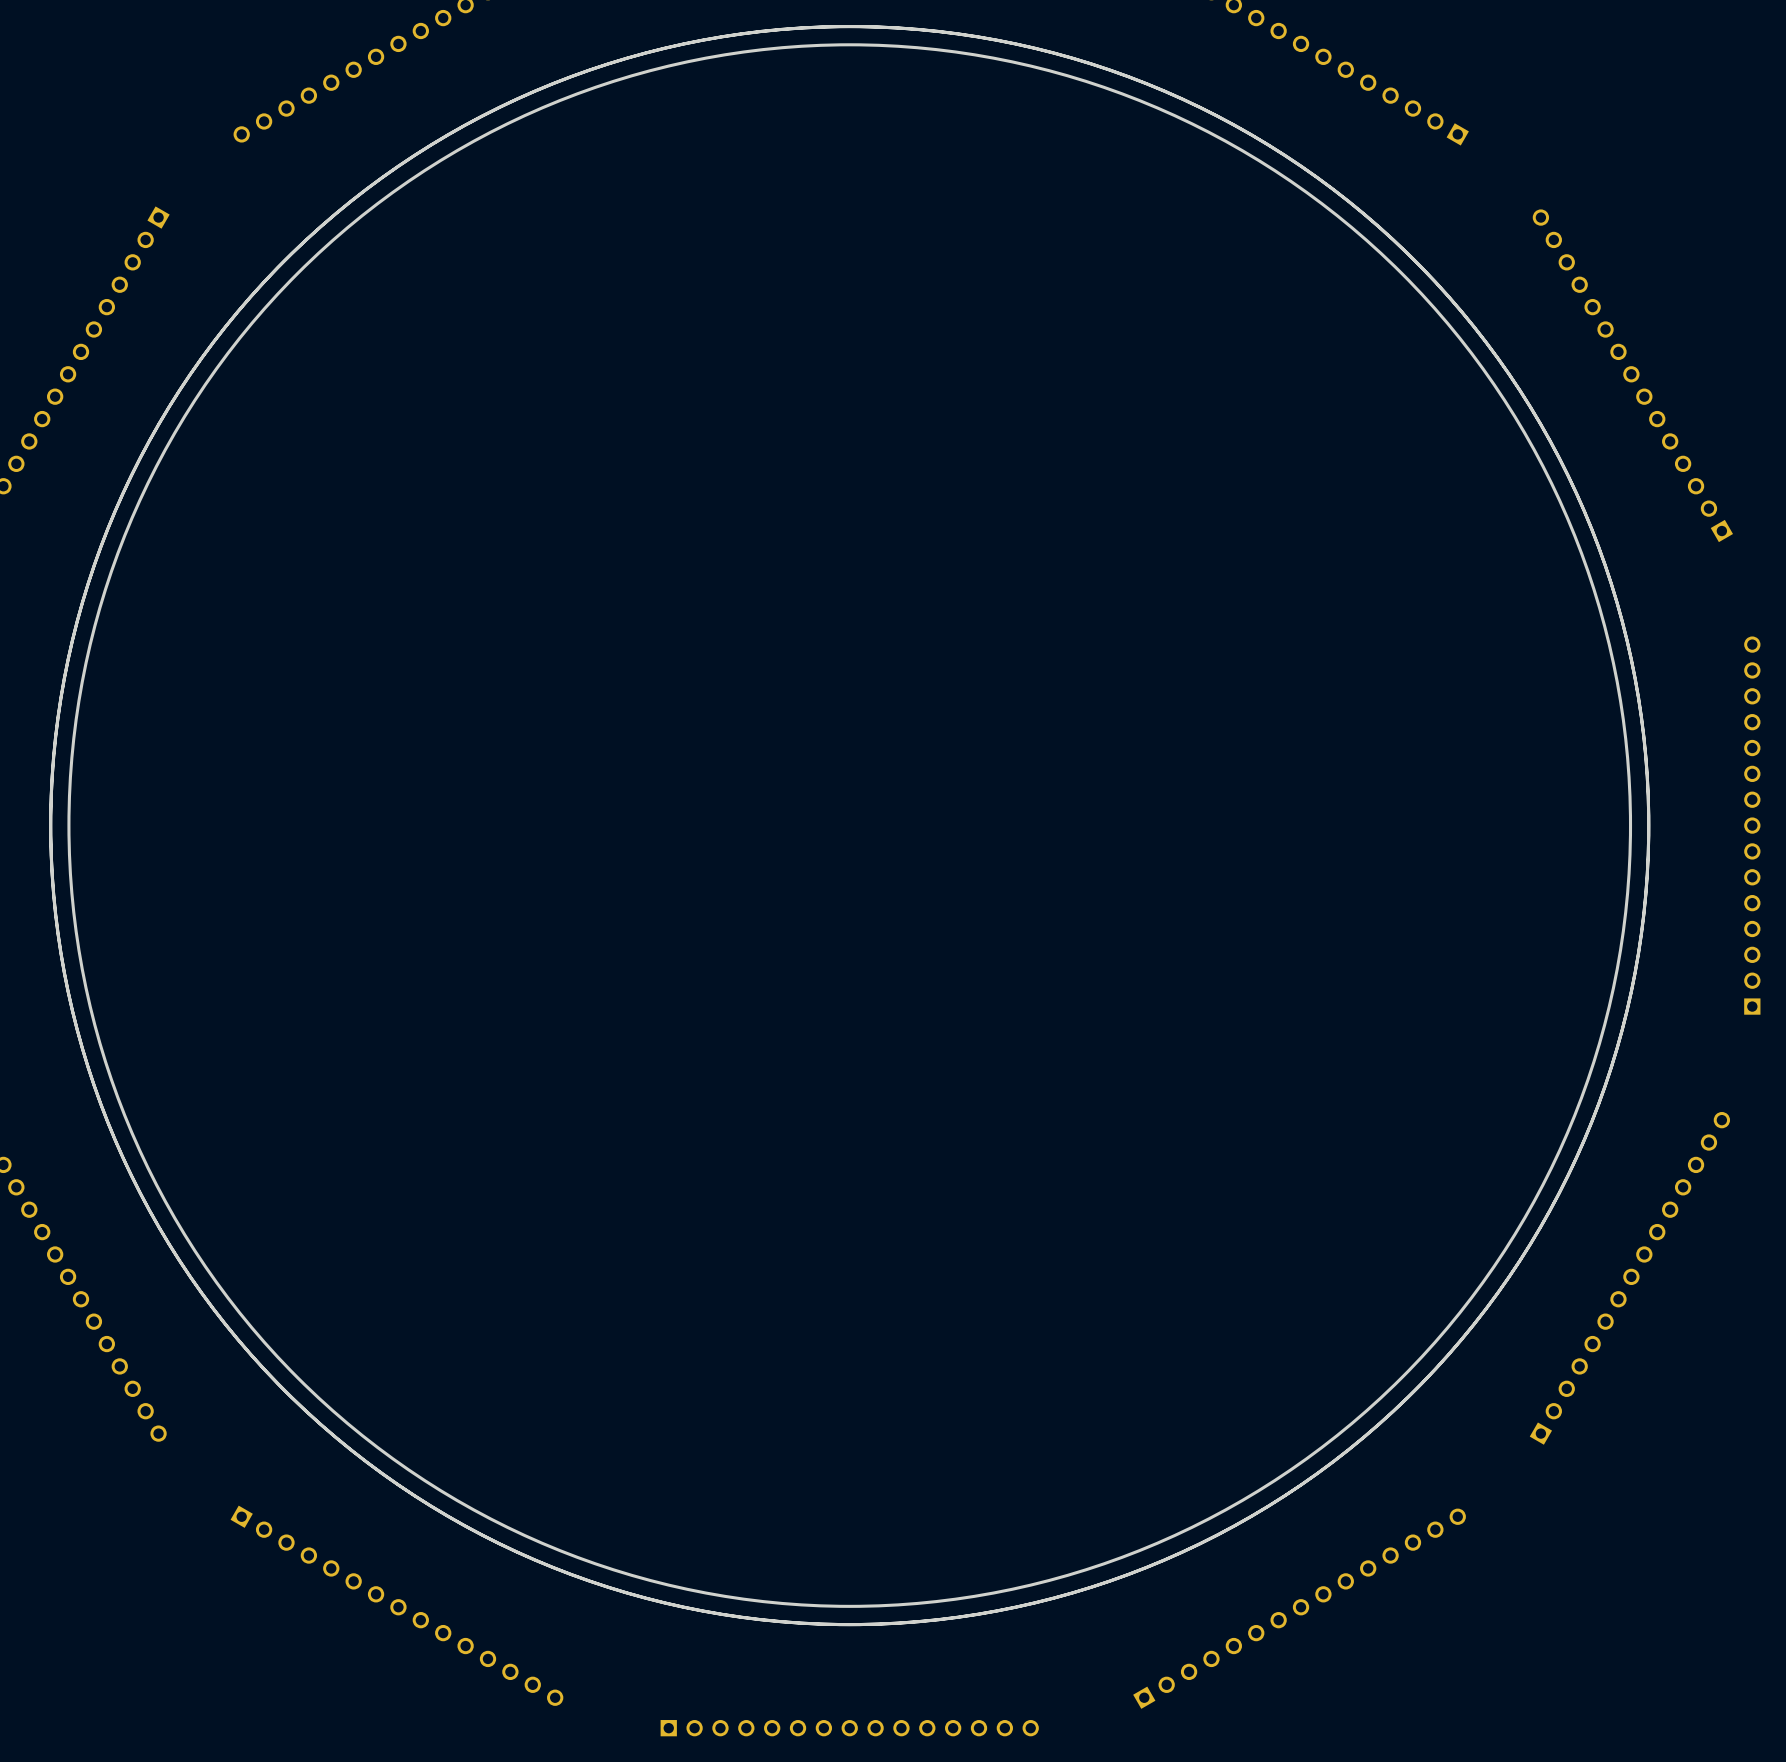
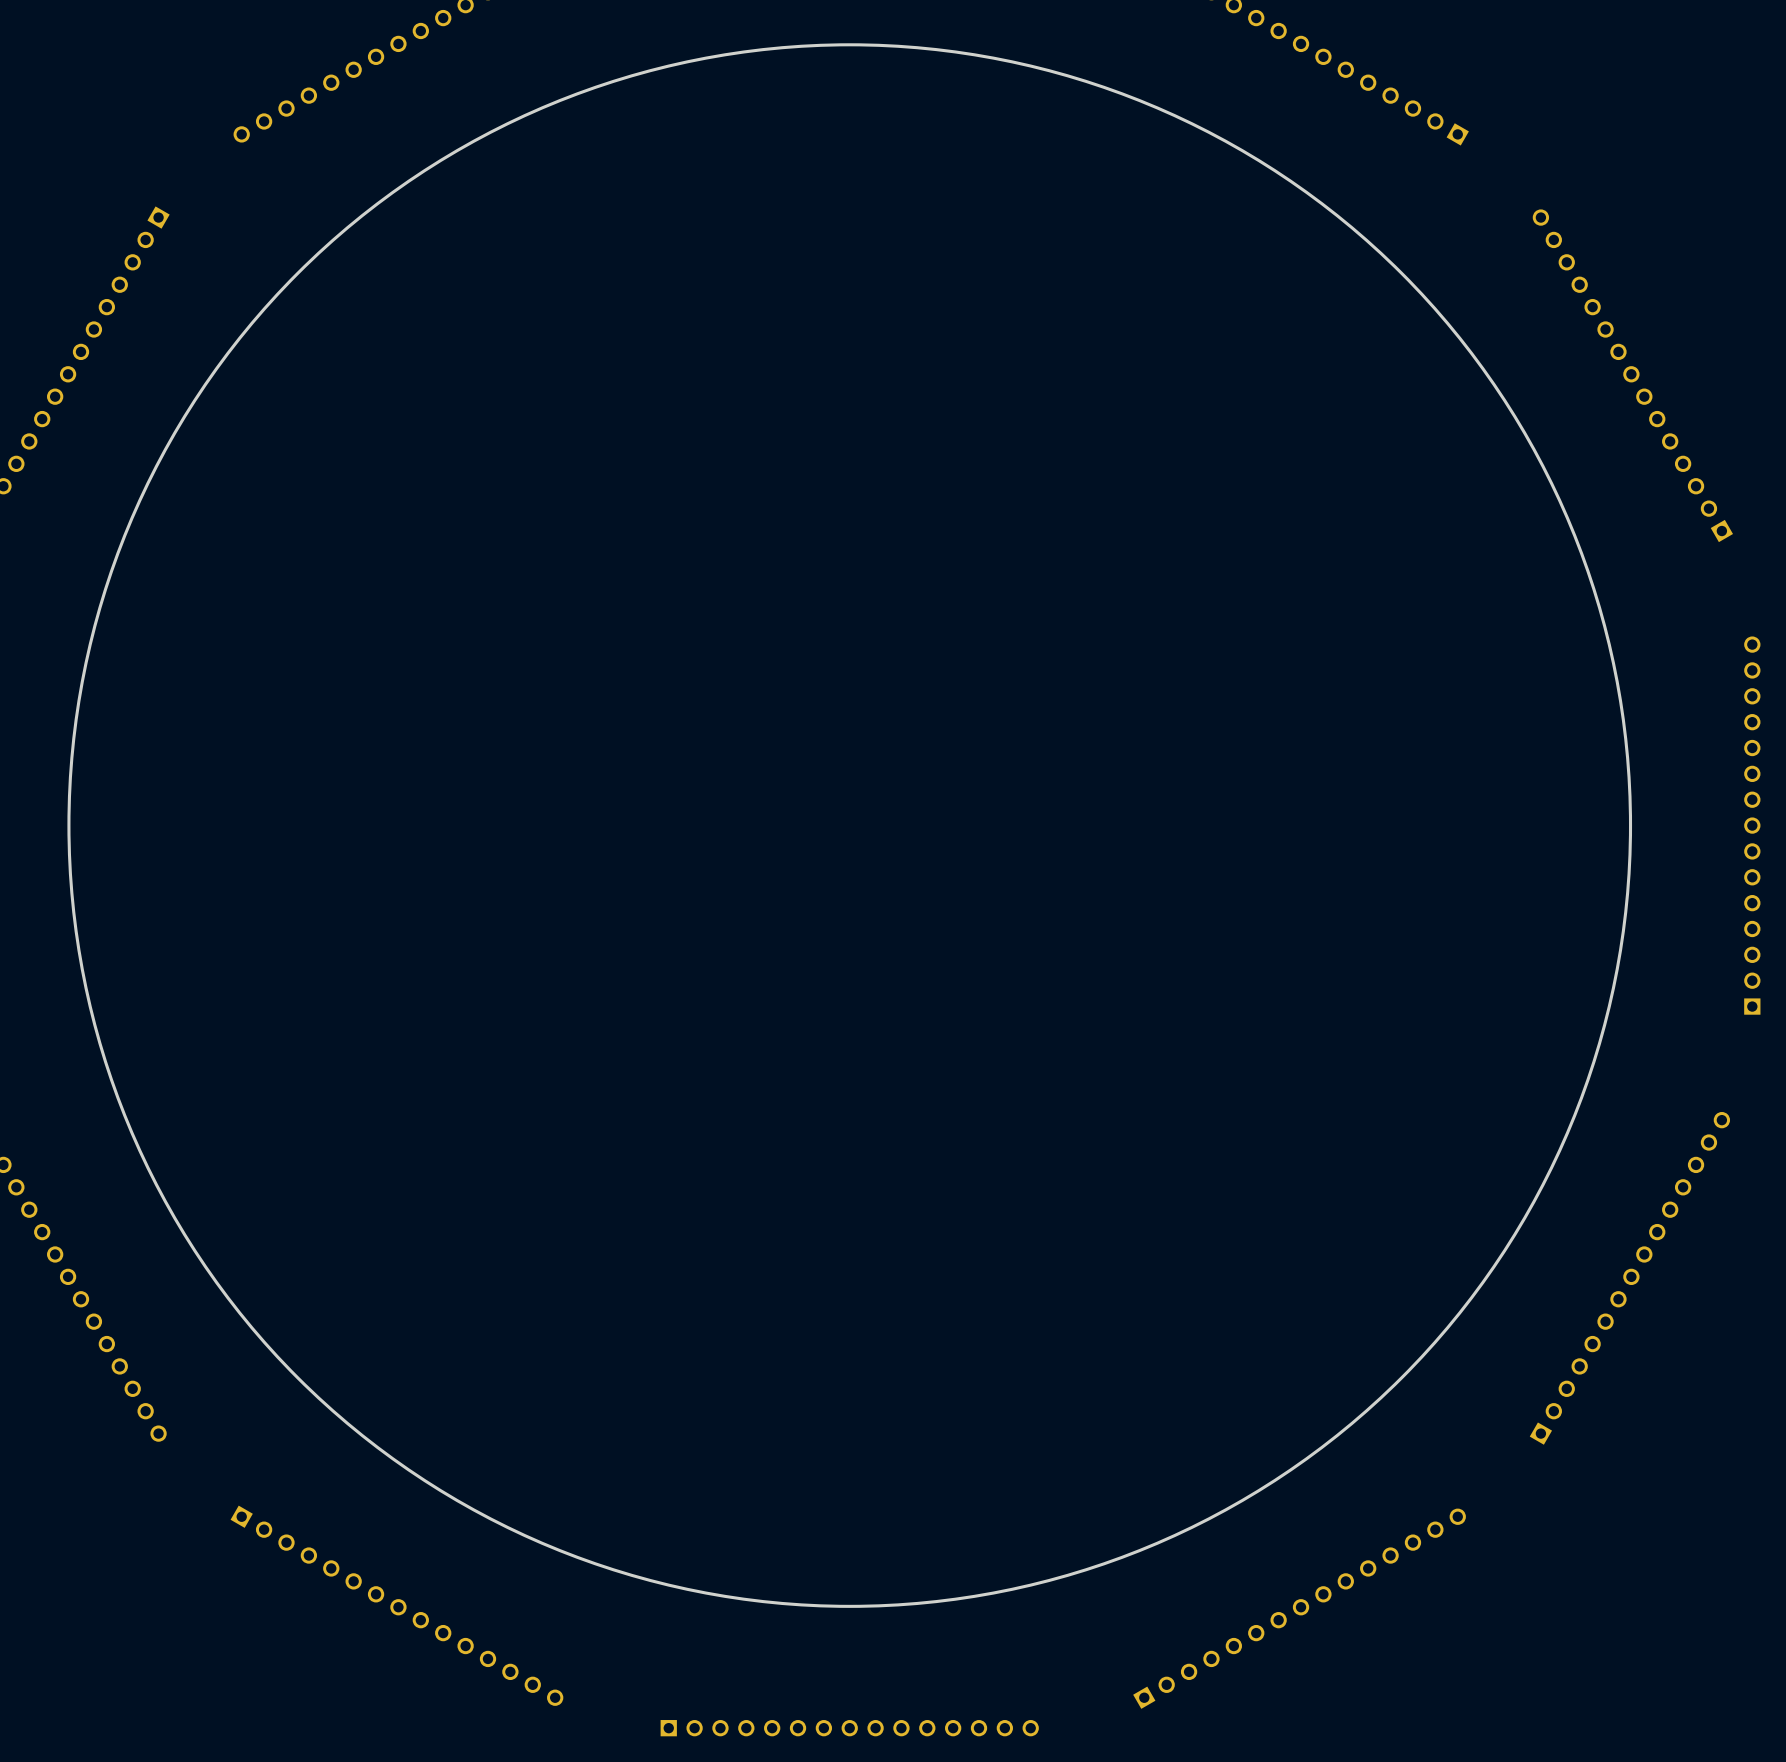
round board edge: [49, 25, 1651, 1627] -> none

